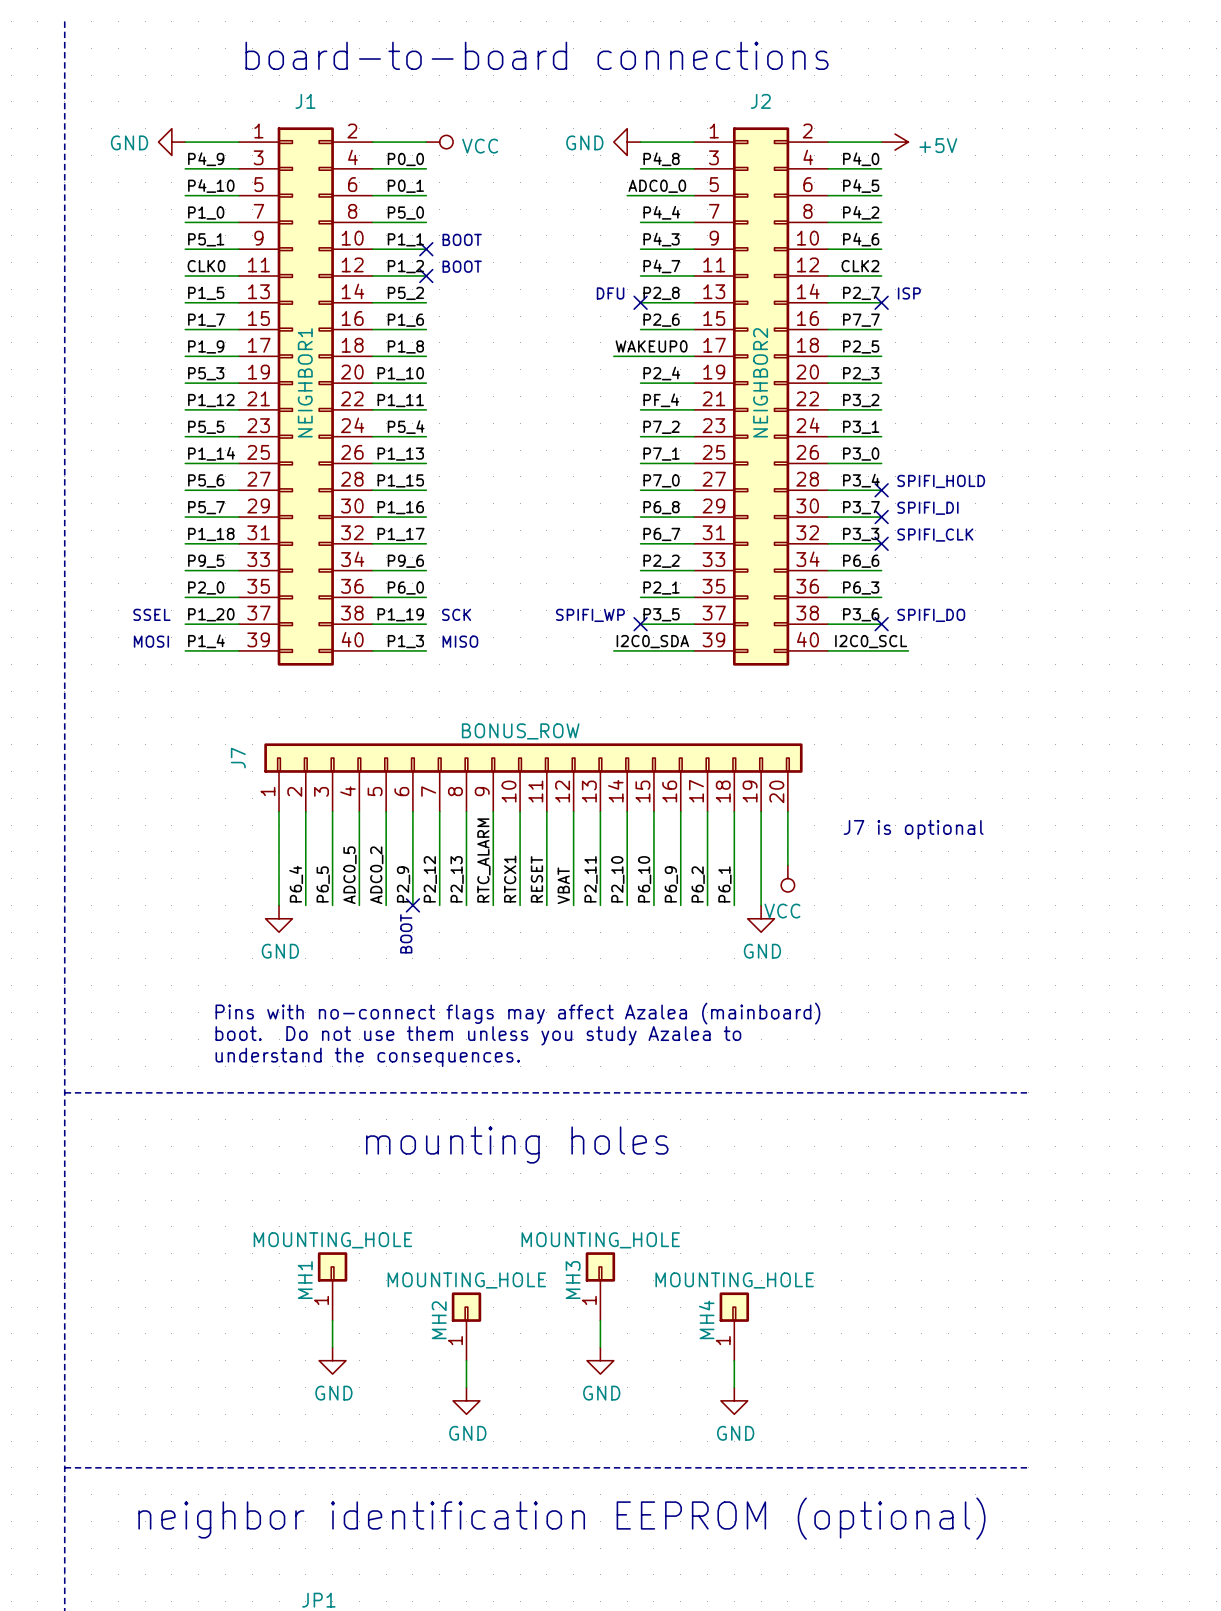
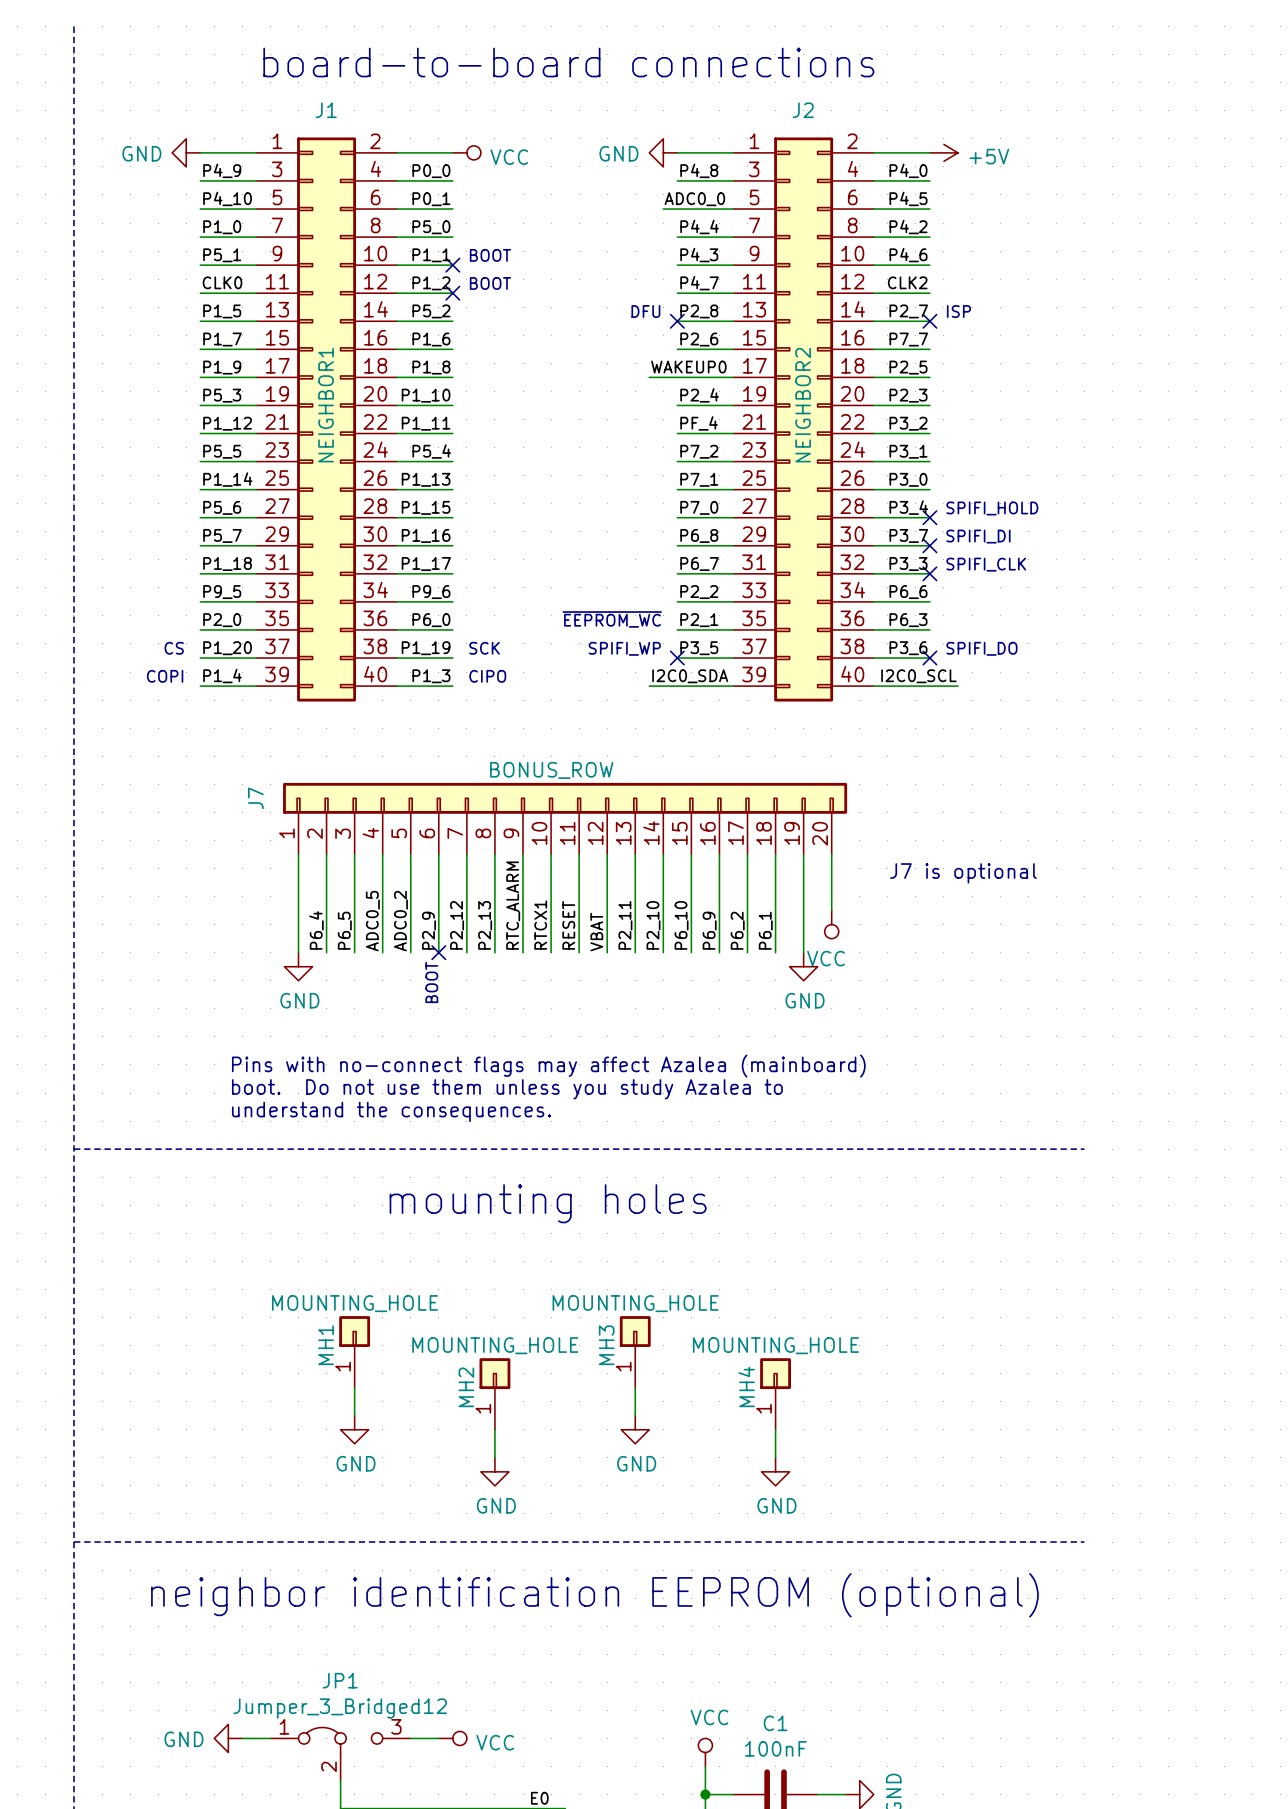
text: none -> ~{EEPROM_WC} (612, 619)
text: SSEL (151, 614) -> CS (174, 648)
text: MOSI (151, 641) -> COPI (165, 676)
text: MISO (460, 641) -> CIPO (487, 676)

